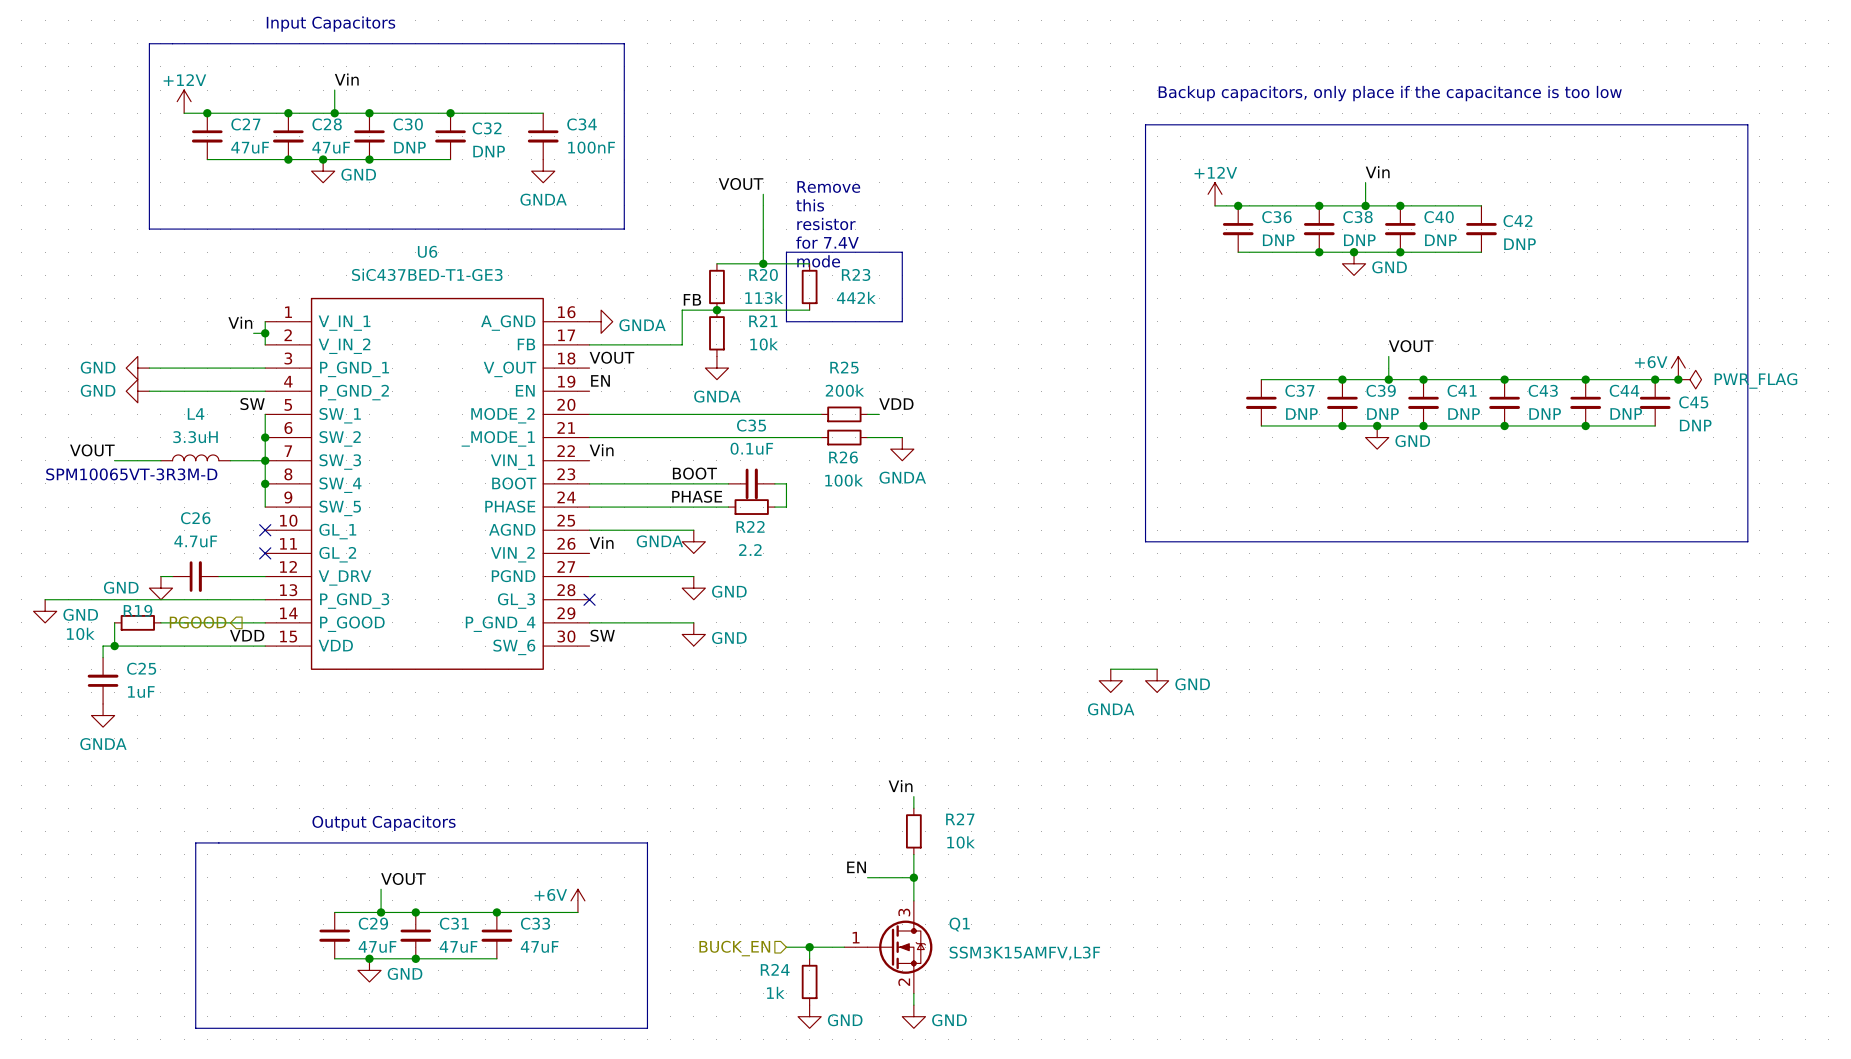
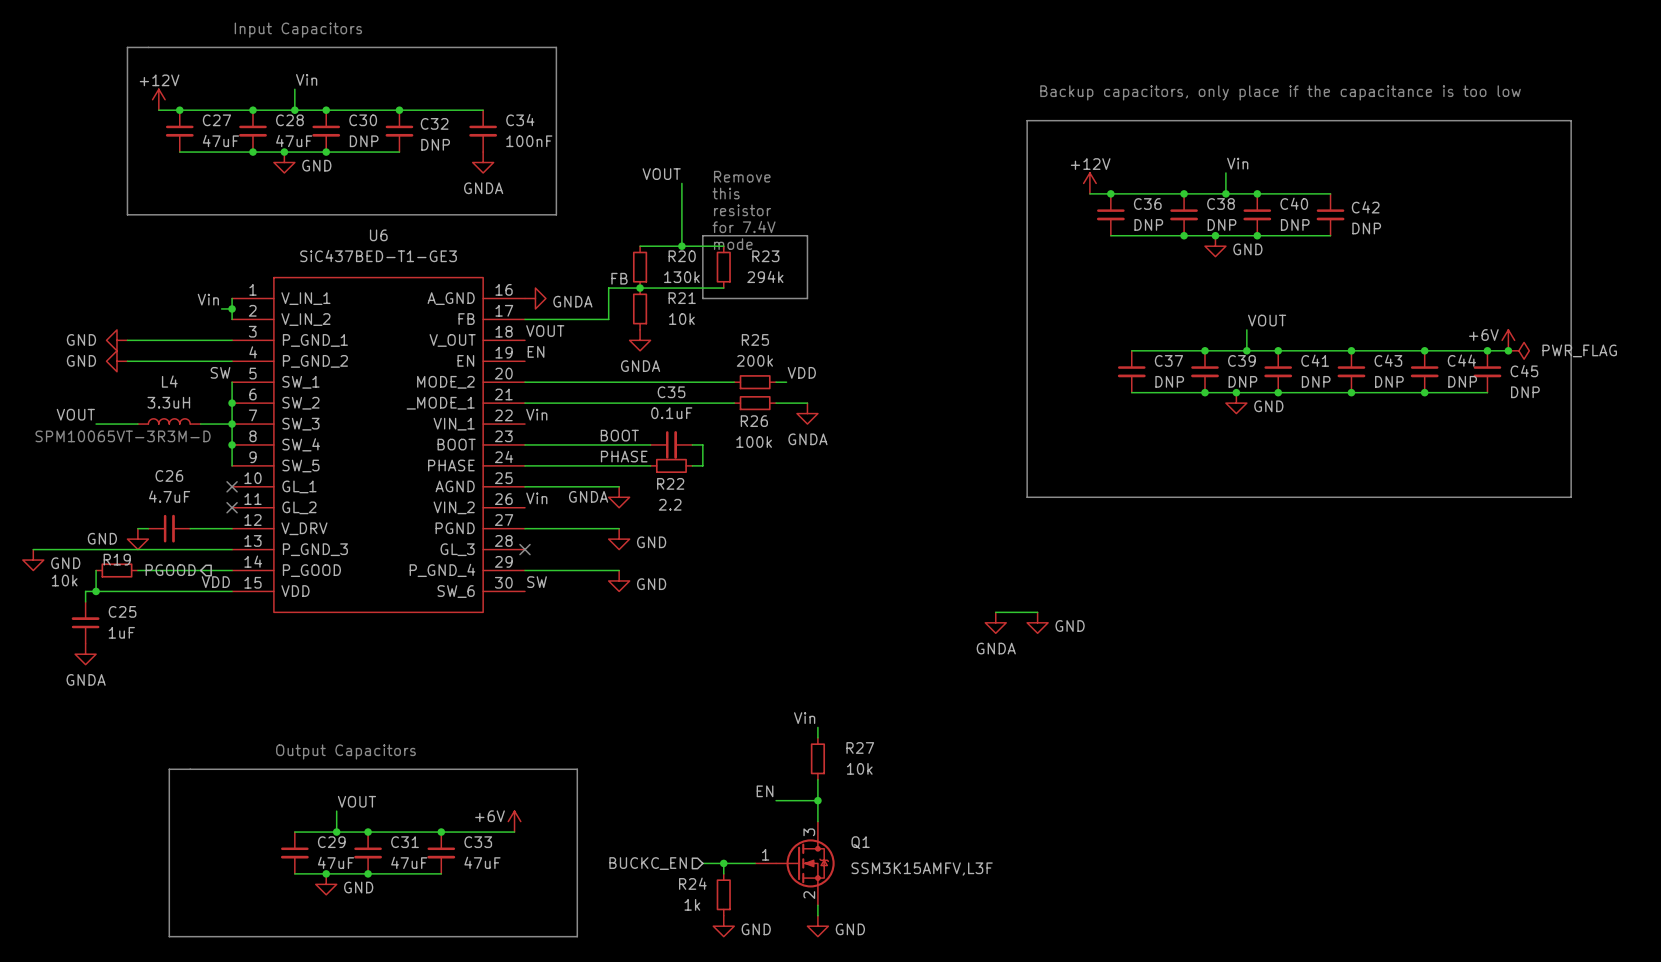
R20 value: 113k (764, 297) -> 130k (681, 277)
R23 value: 442k (856, 297) -> 294k (765, 276)
hierarchical label: BUCK_EN (734, 948) -> BUCKC_EN (648, 863)

